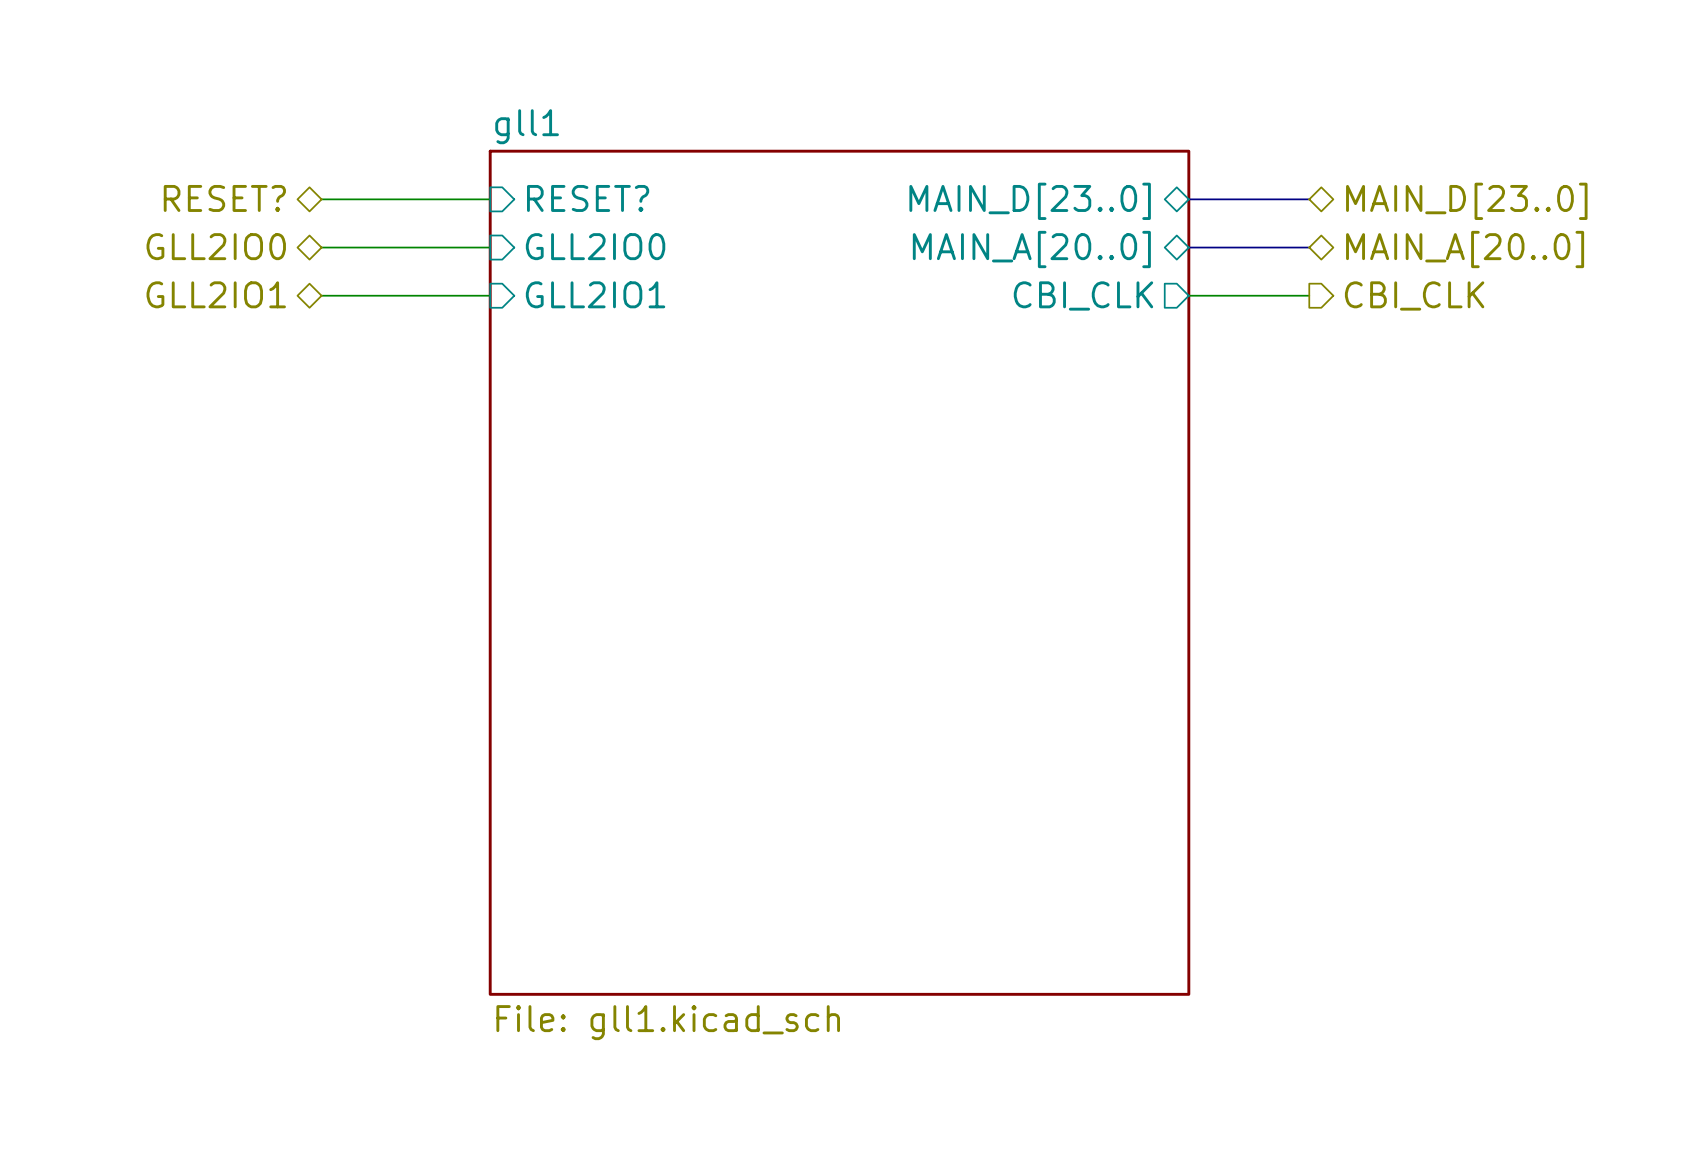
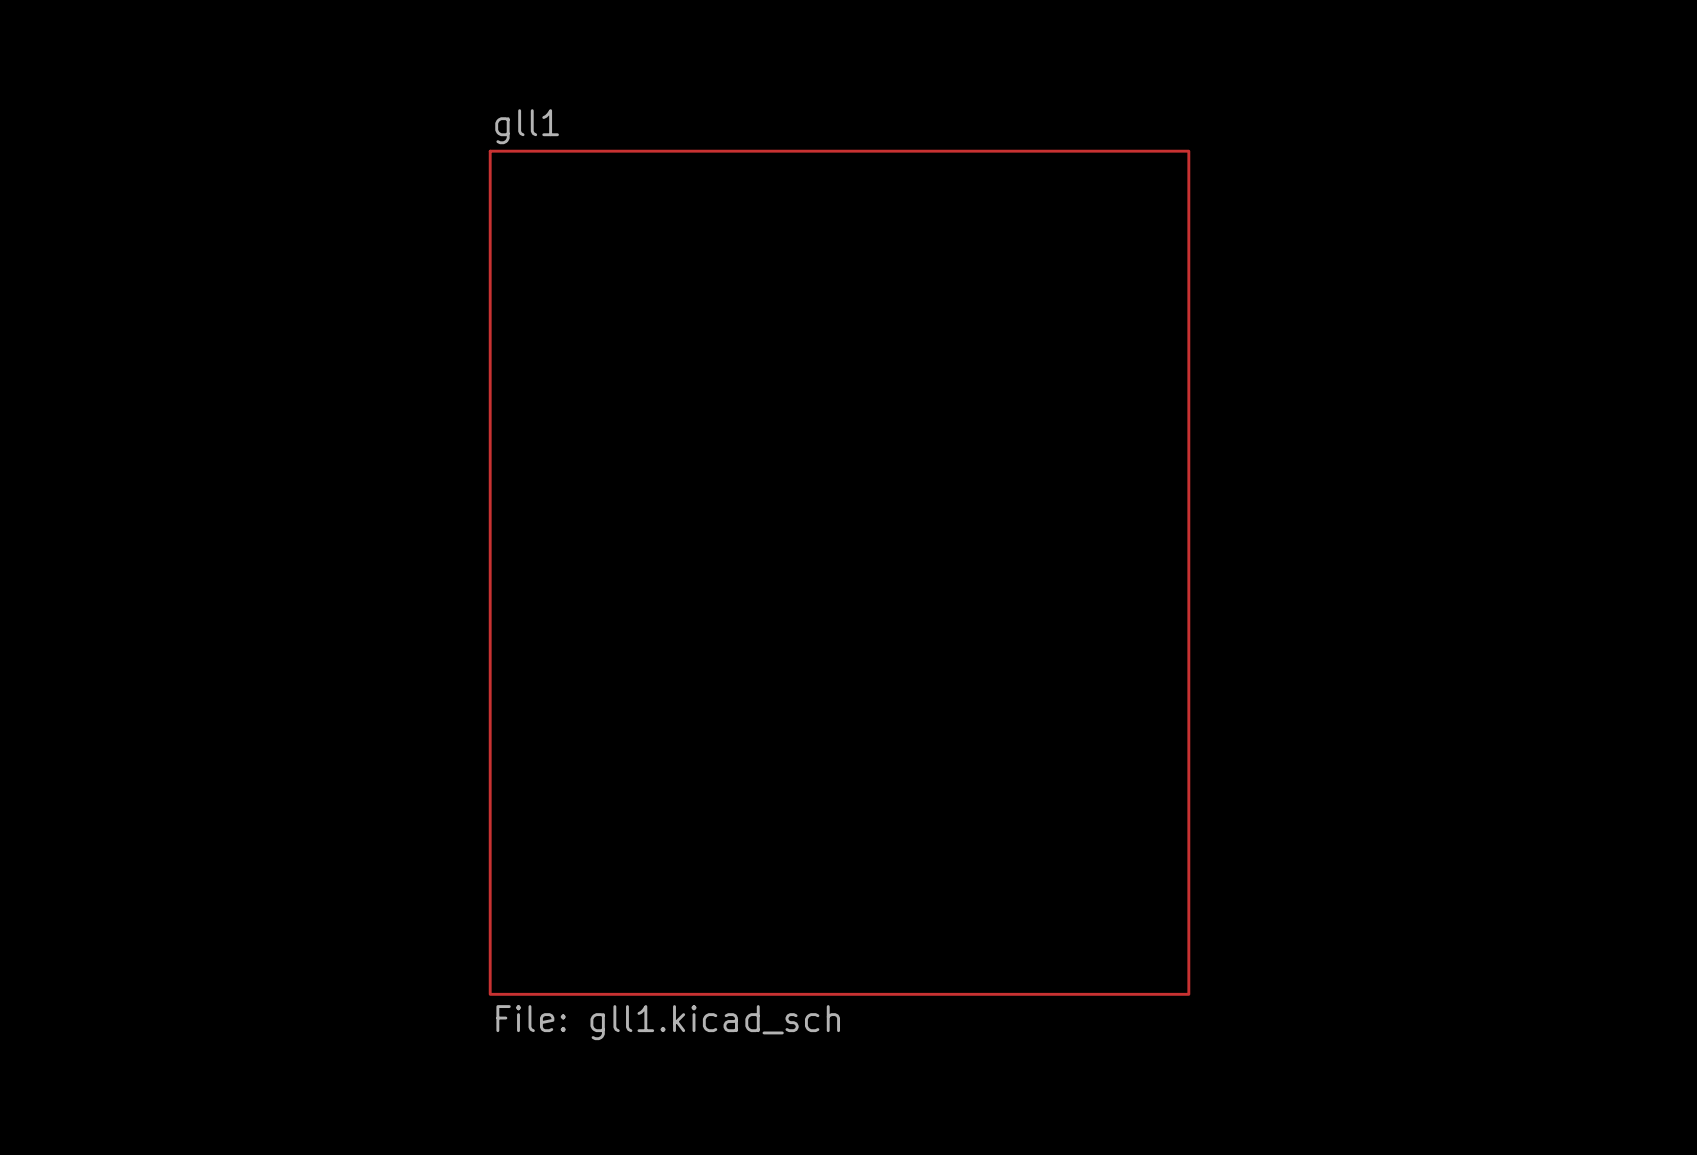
hierarchical label: RESET? (224, 198) -> none
sheet pin: RESET? (588, 198) -> none
wire: (321, 199) (490, 199) -> none
bus: (1188, 199) (1309, 199) -> none
sheet pin: MAIN_D[23..0] (1030, 201) -> none
hierarchical label: MAIN_D[23..0] (1466, 201) -> none
hierarchical label: GLL2IO0 (216, 246) -> none
sheet pin: GLL2IO0 (595, 246) -> none
wire: (321, 247) (490, 247) -> none
bus: (1188, 247) (1309, 247) -> none
sheet pin: MAIN_A[20..0] (1031, 249) -> none
hierarchical label: MAIN_A[20..0] (1465, 249) -> none
hierarchical label: GLL2IO1 (216, 294) -> none
sheet pin: GLL2IO1 (595, 294) -> none
wire: (321, 295) (490, 295) -> none
sheet pin: CBI_CLK (1083, 295) -> none
wire: (1188, 295) (1309, 295) -> none
hierarchical label: CBI_CLK (1414, 295) -> none

